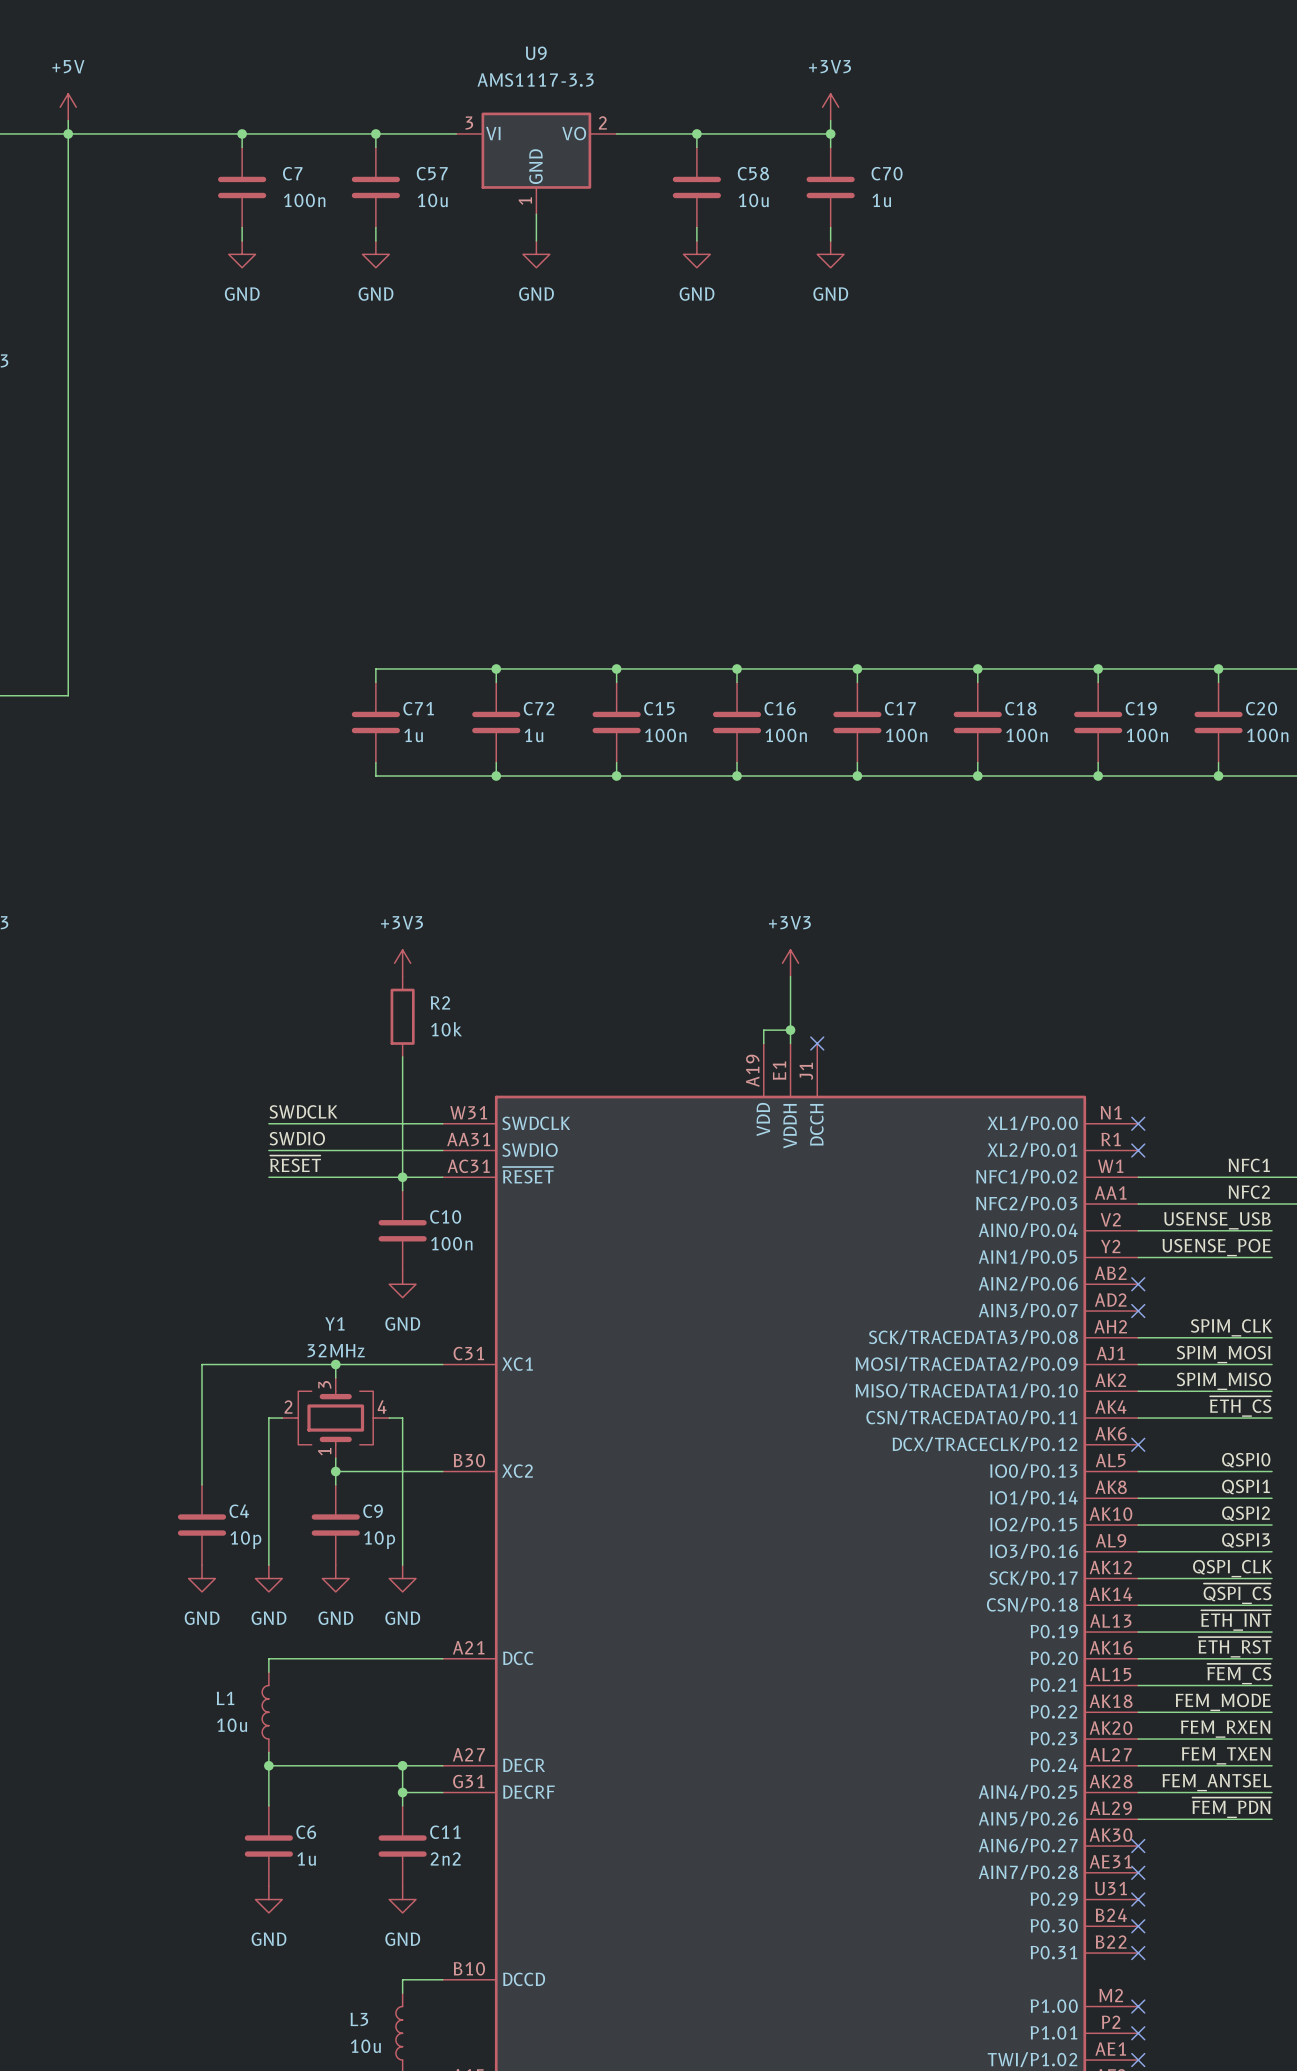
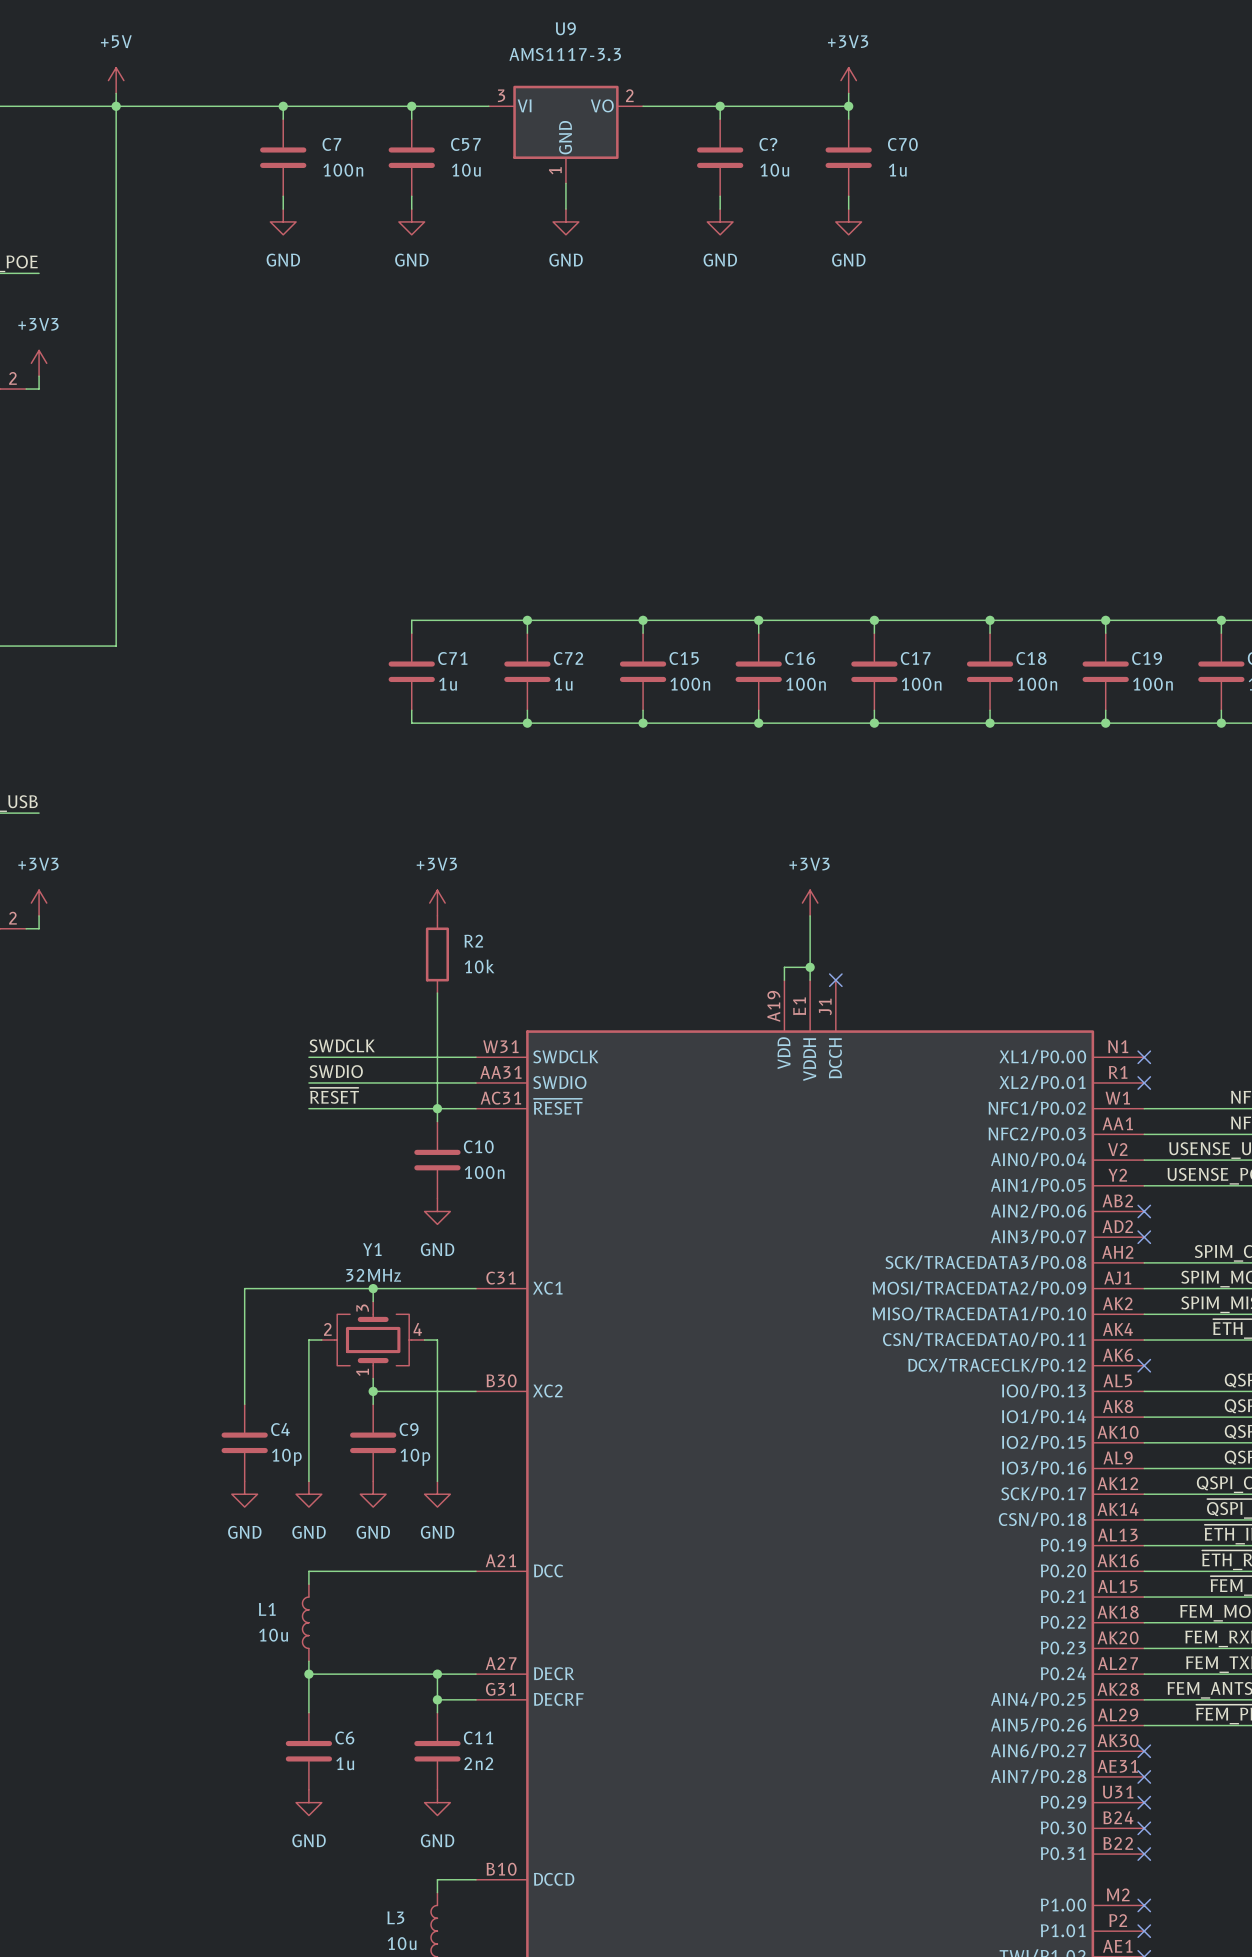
C58 name: C58 (753, 173) -> C? (768, 144)

